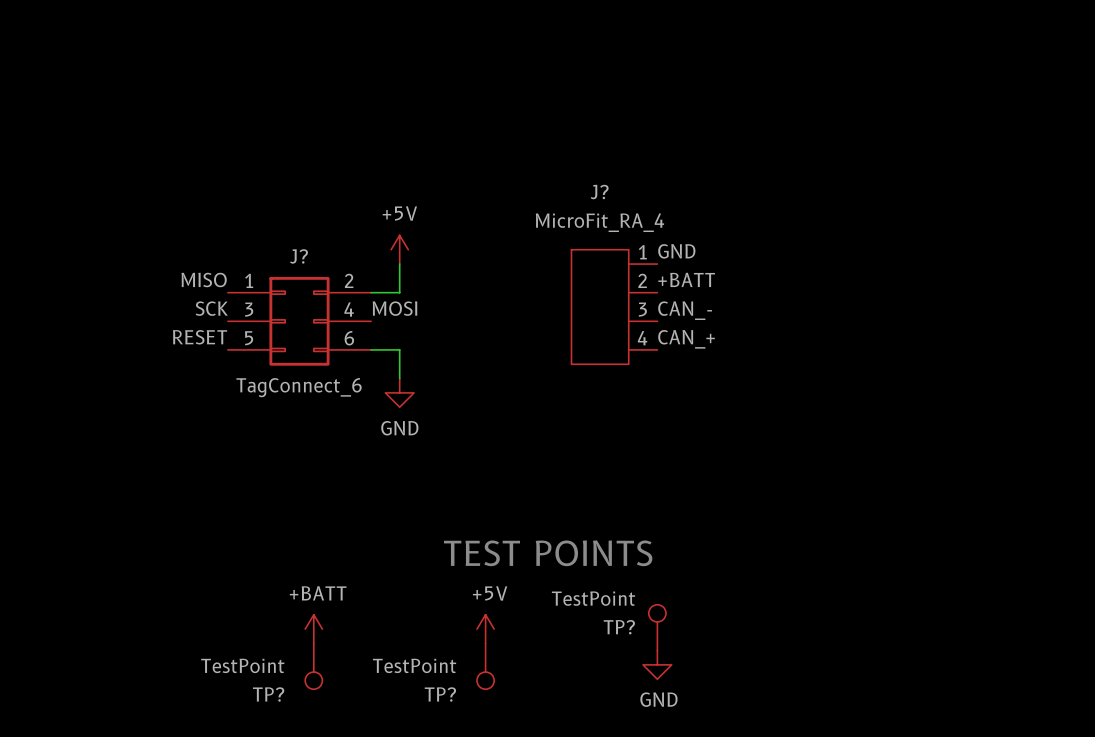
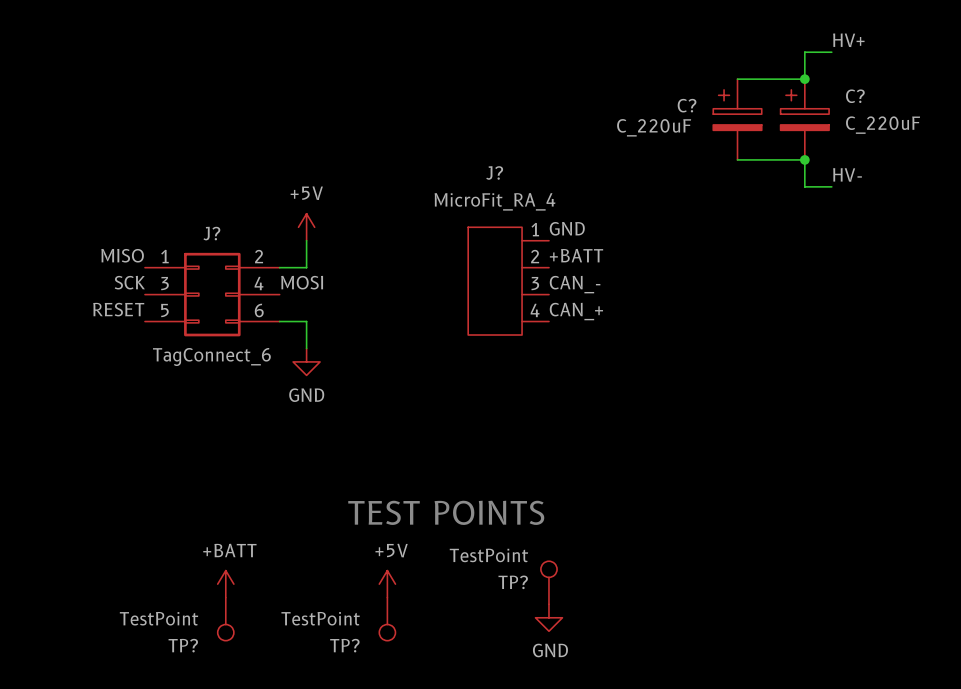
label: none -> HV+ (848, 40)
wire: none -> (831, 52) (804, 52) (804, 79) (737, 79)
junction: none -> (804, 79)
C?: none -> C_220uF (737, 119)
C?: none -> C_220uF (804, 119)
wire: none -> (737, 159) (804, 159) (804, 186) (831, 186)
junction: none -> (804, 159)
label: none -> HV- (847, 174)

